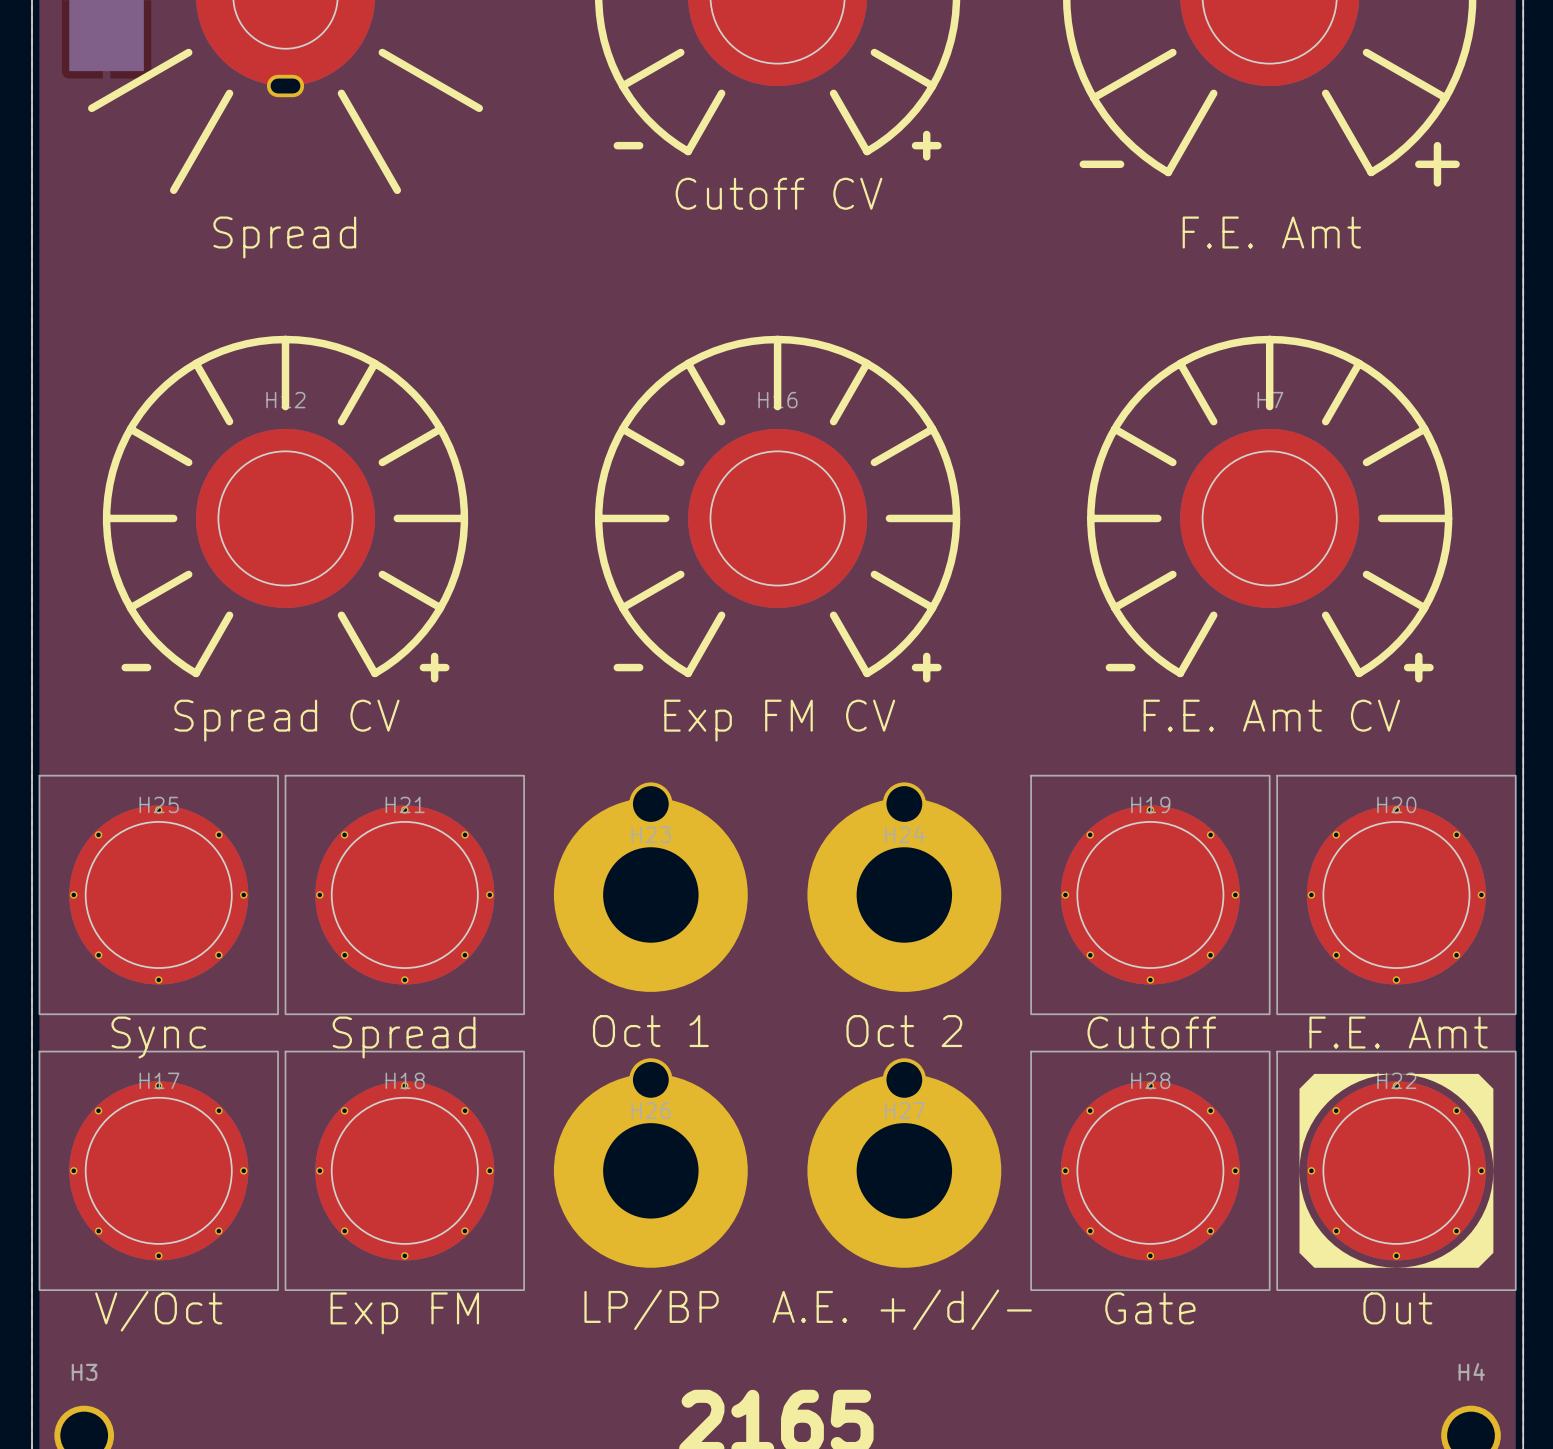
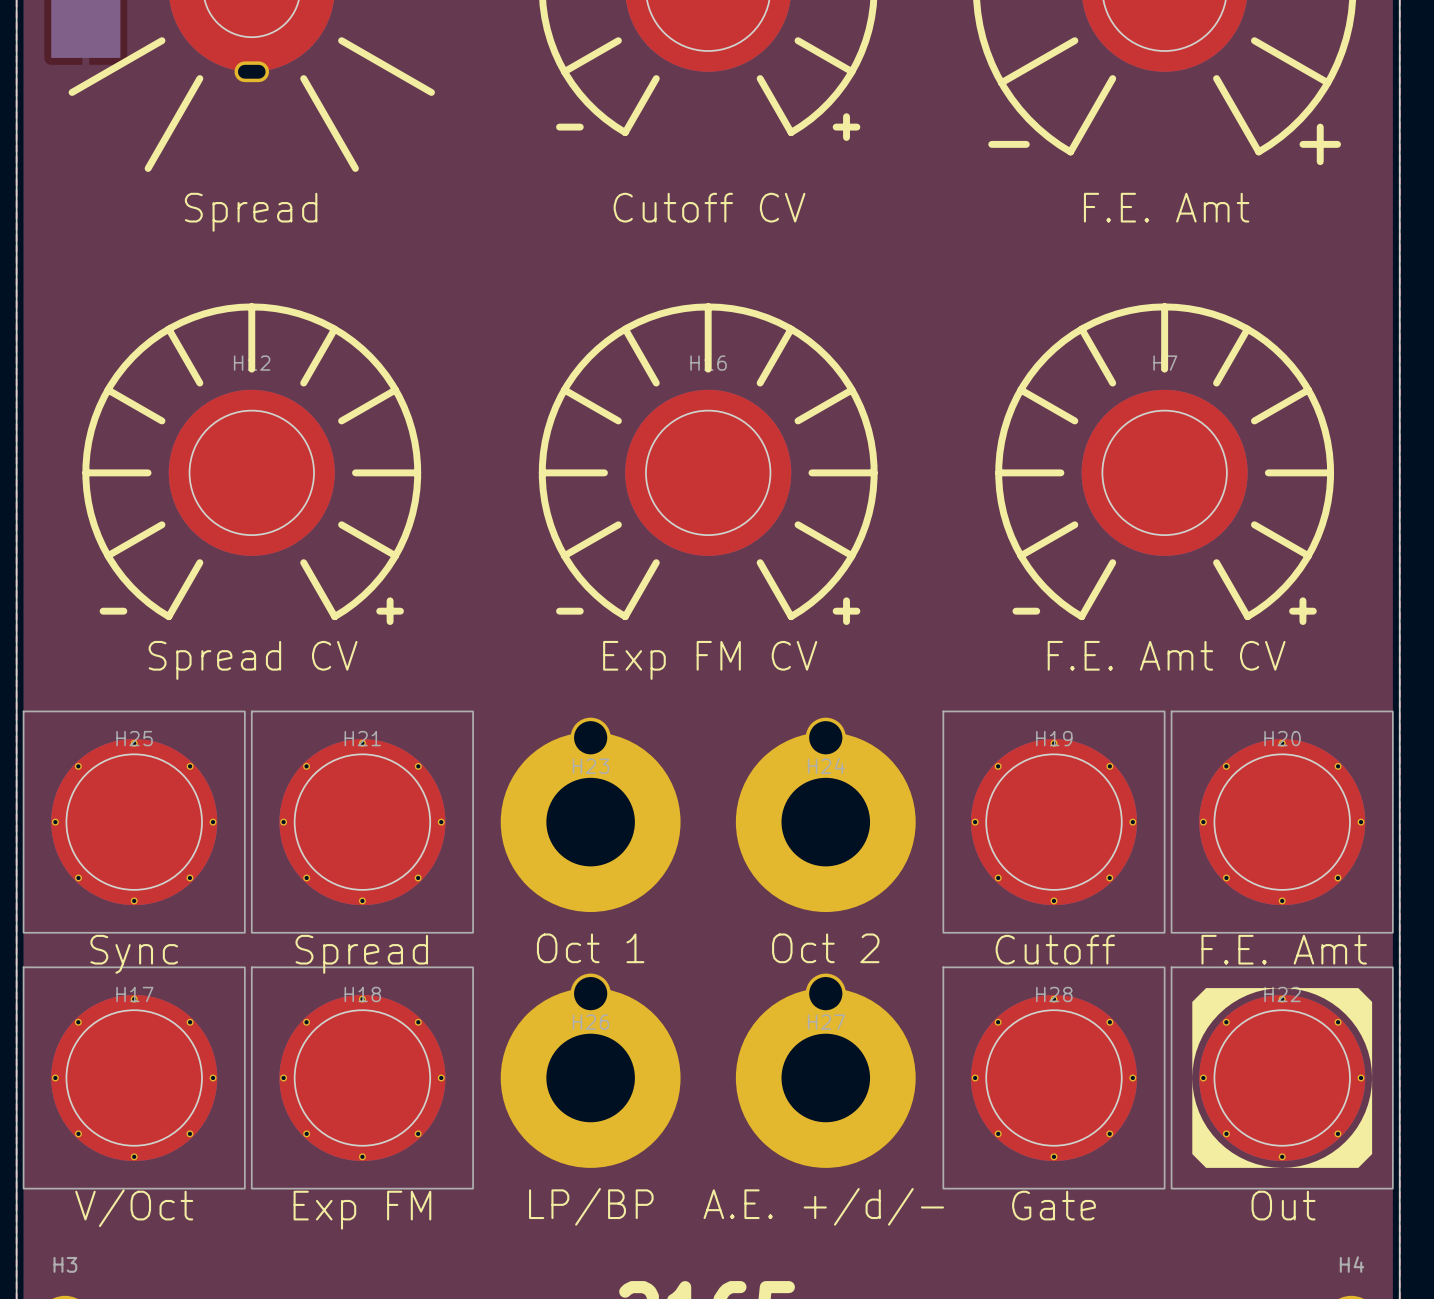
part value position: Cutoff CV (779, 193) -> Cutoff CV (709, 207)

